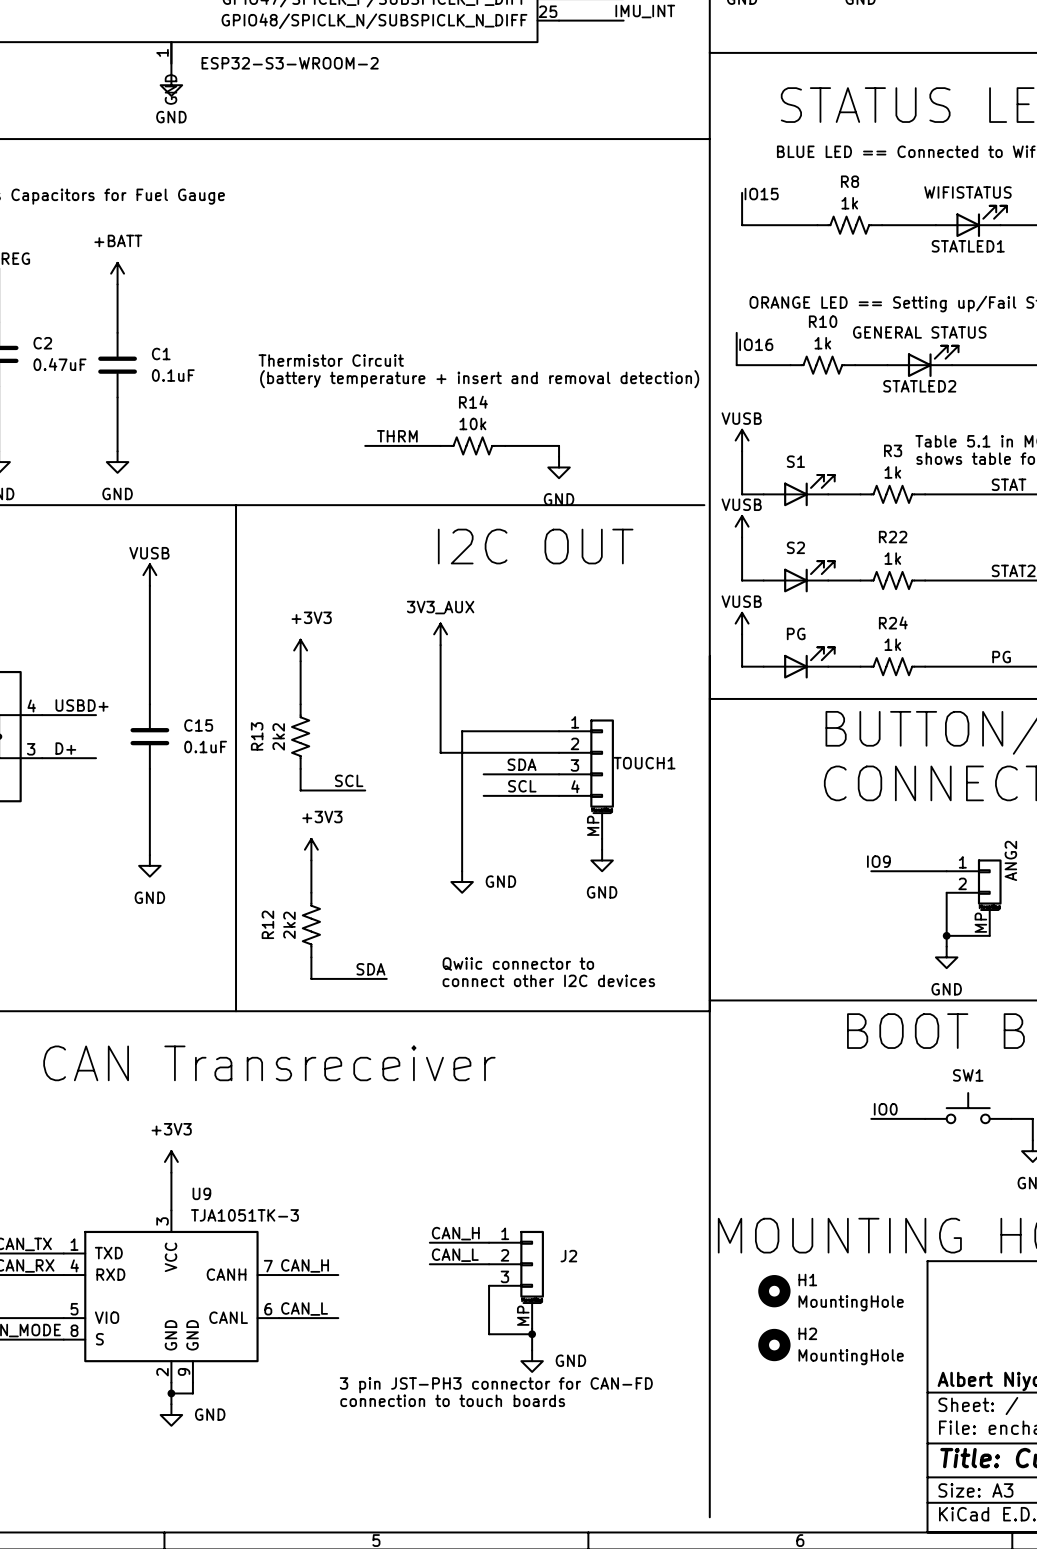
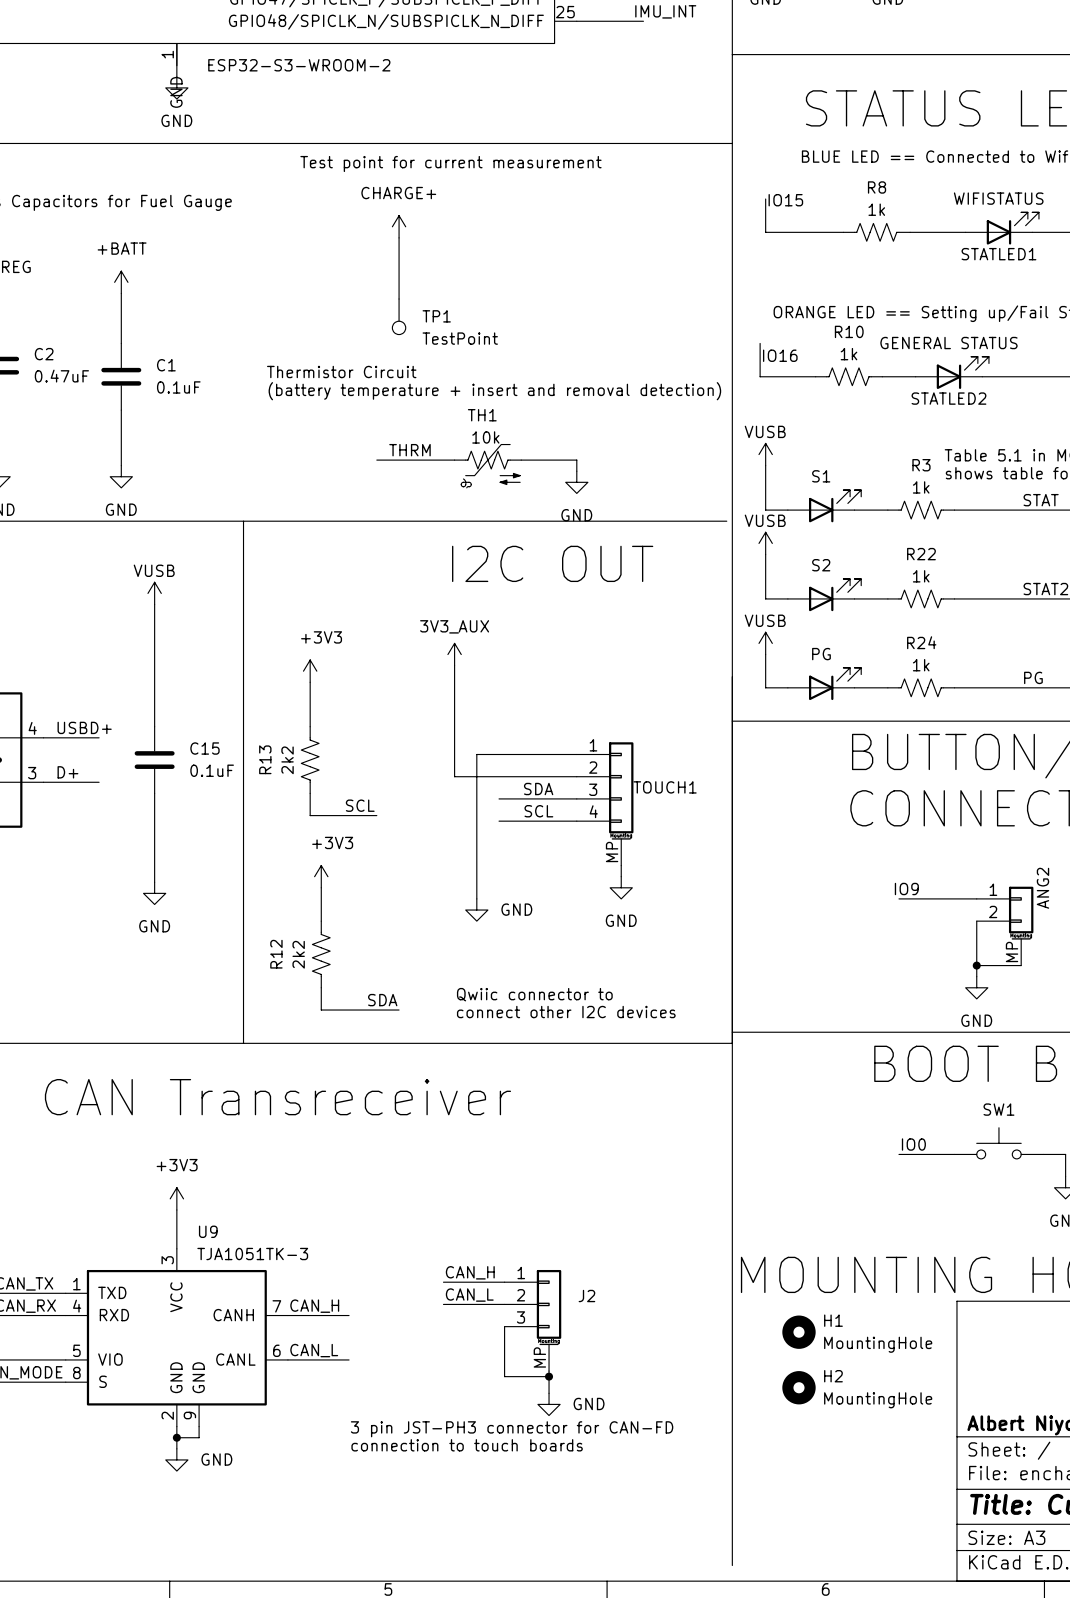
text: none -> Test point for current measurement (450, 163)
power symbol: none -> CHARGE+ (399, 226)
wire: none -> (399, 237) (399, 299)
TP1: none -> TestPoint (399, 316)
R14: 10k (472, 445) -> none
TH1: none -> 10k (487, 466)

